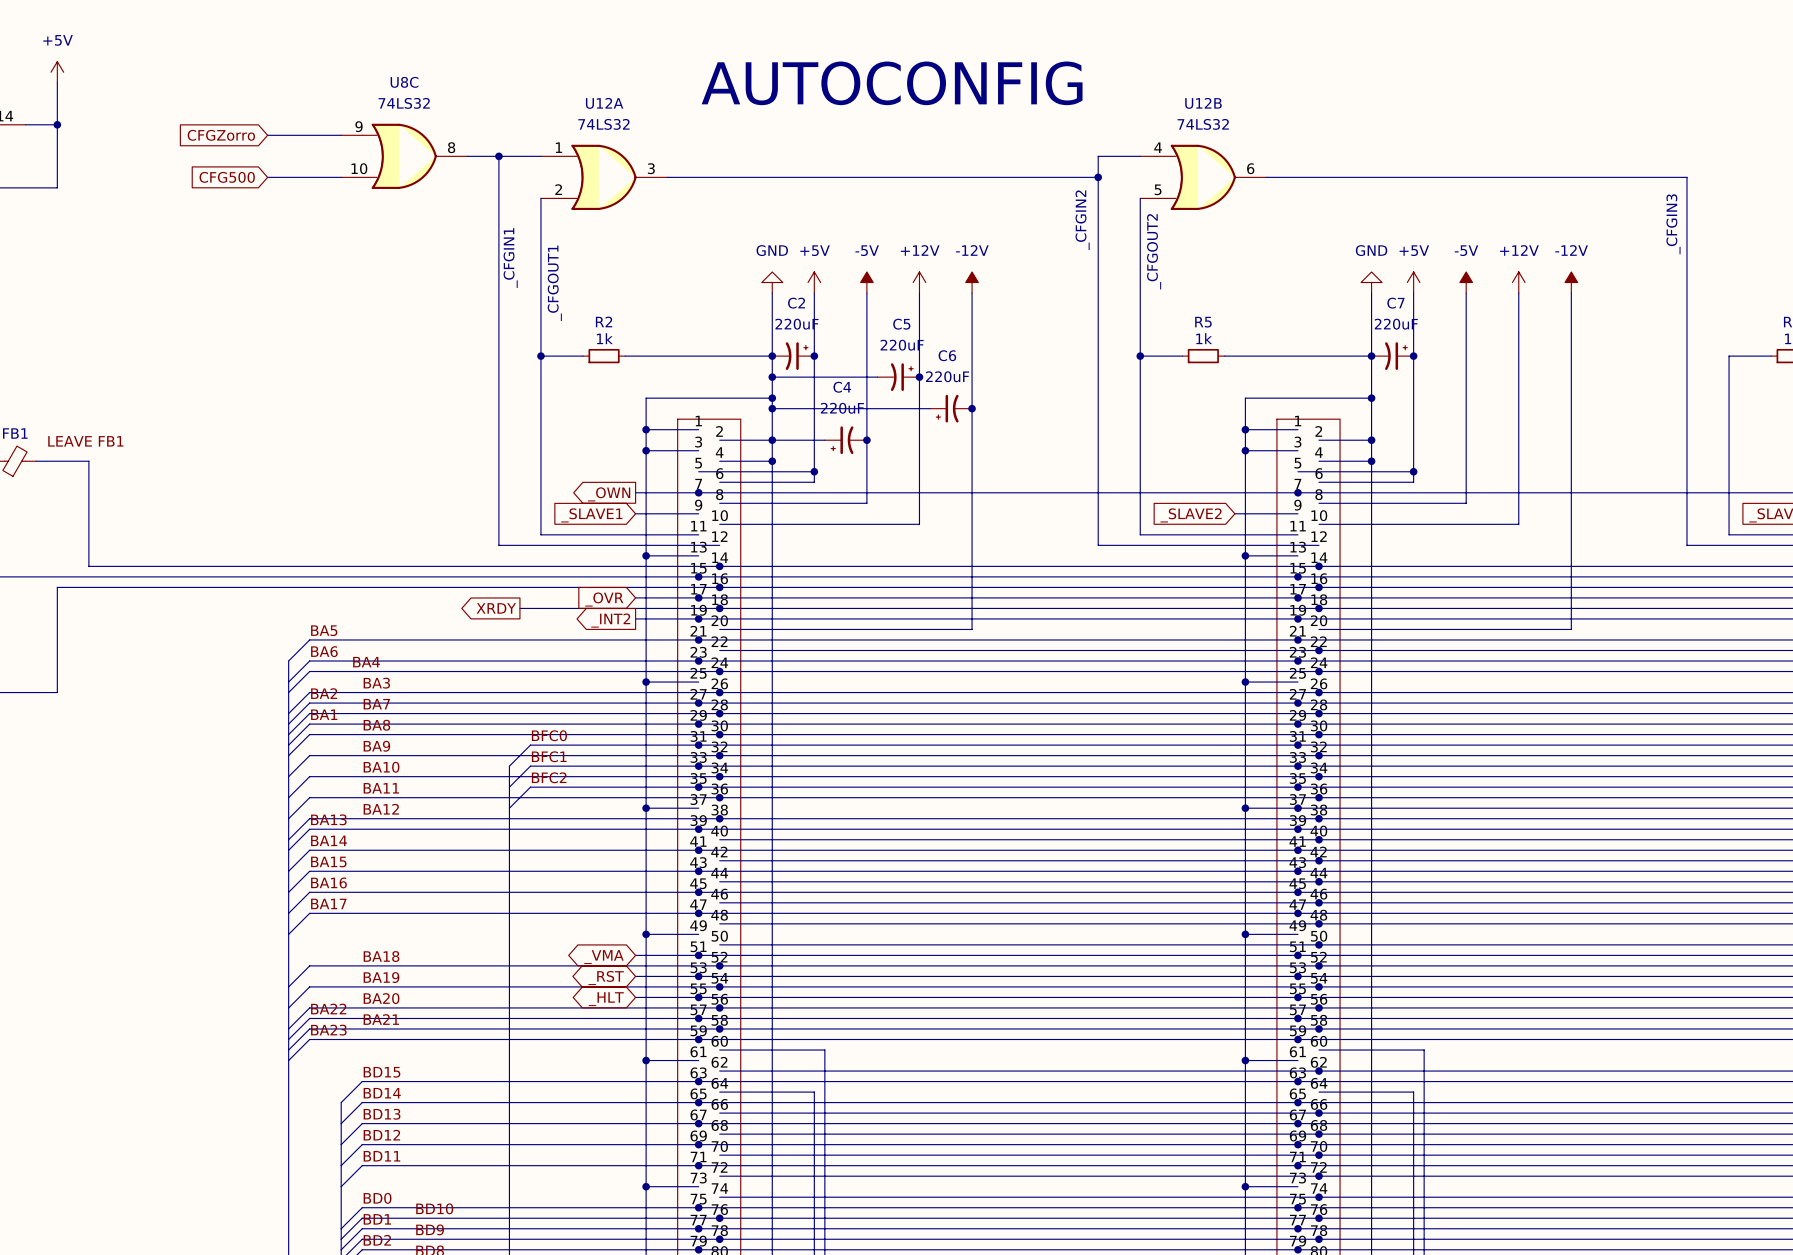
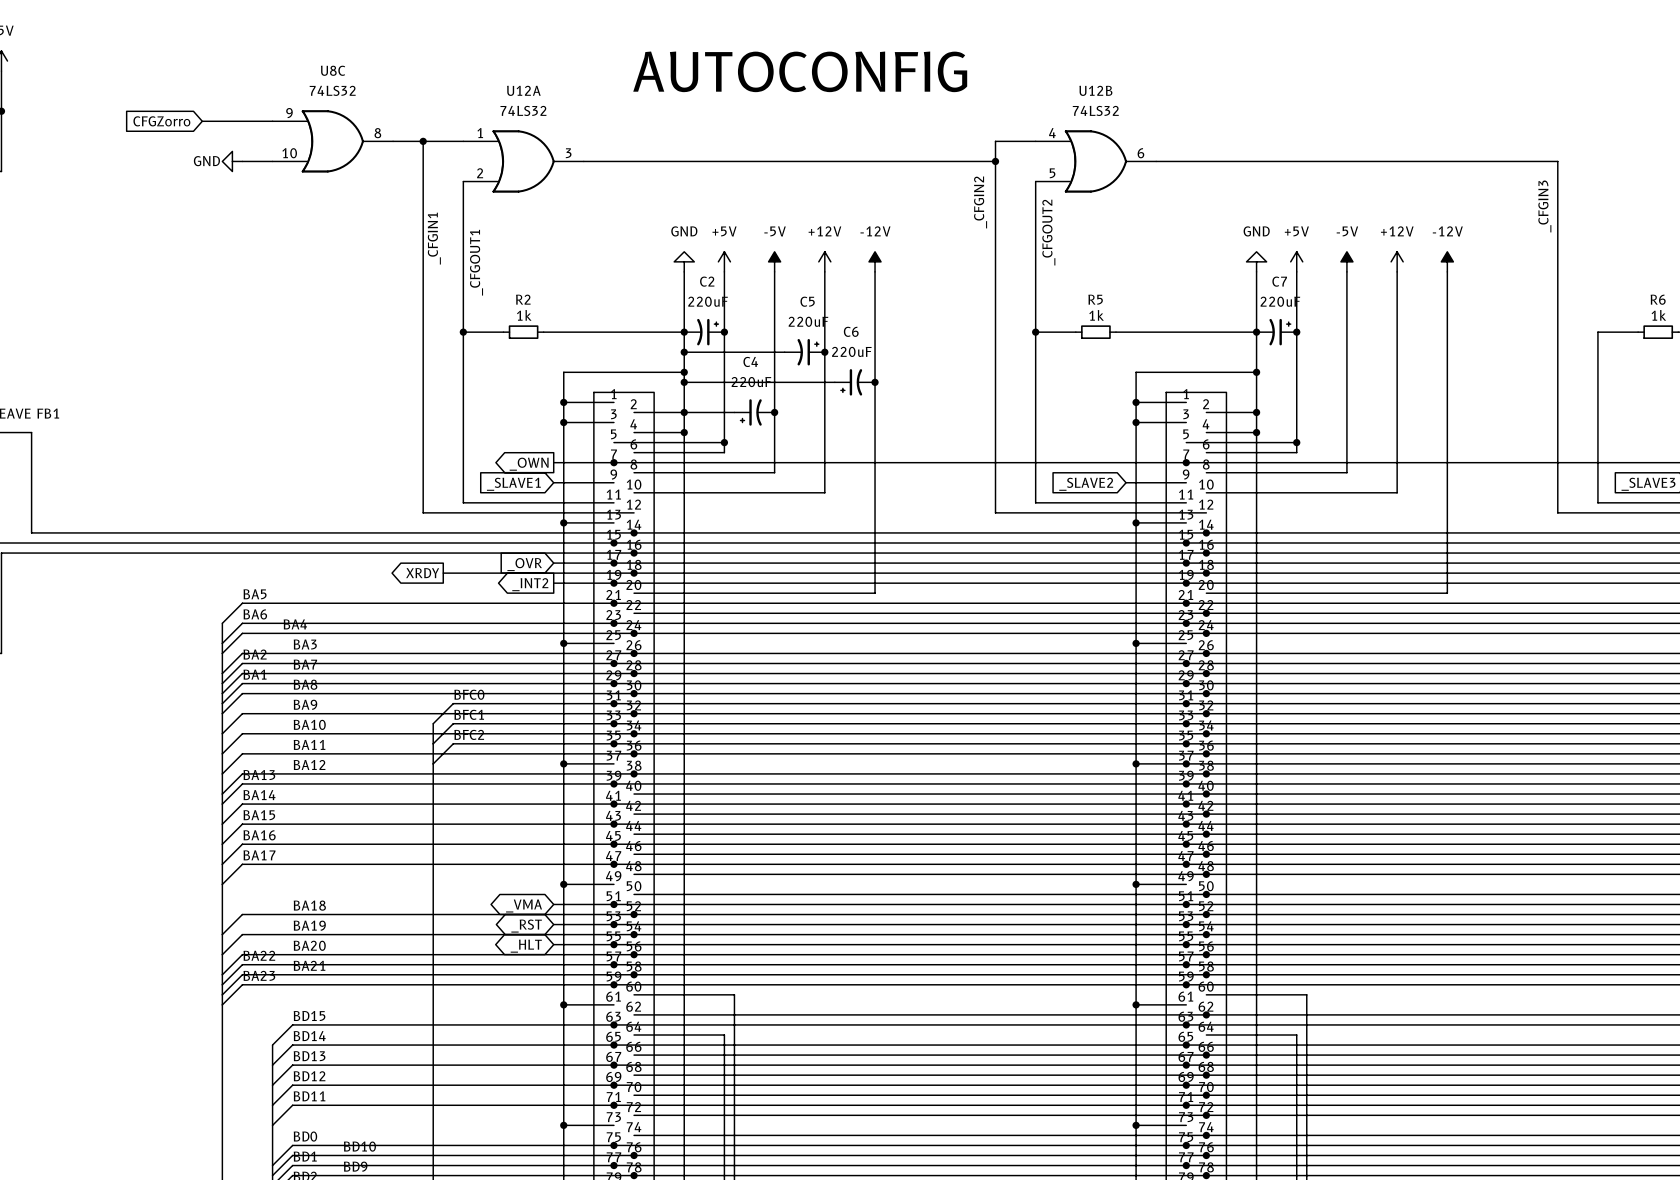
global label: CFG500 (227, 177) -> none
wire: (267, 177) (309, 177) -> none
power symbol: none -> GND (232, 161)

